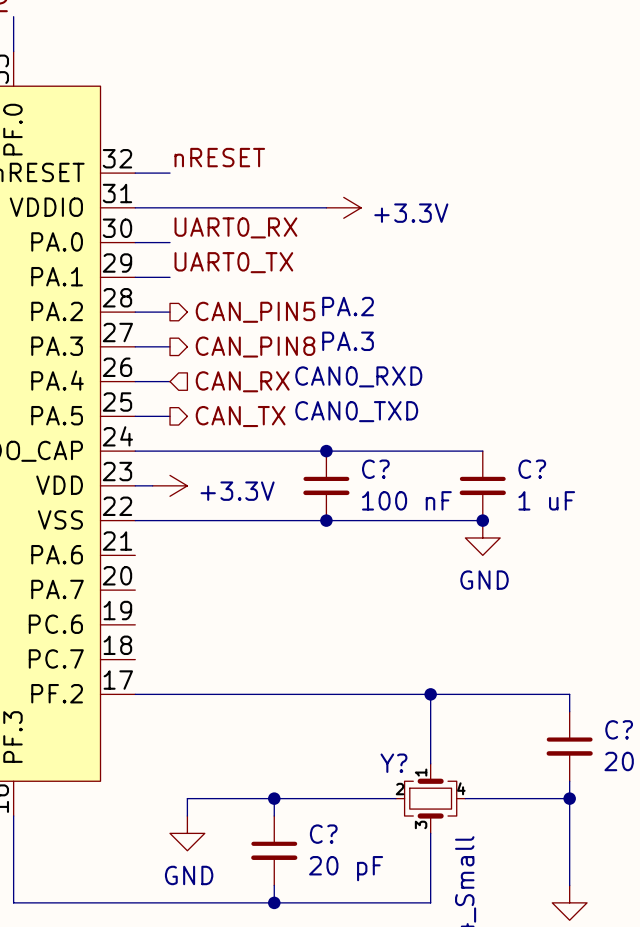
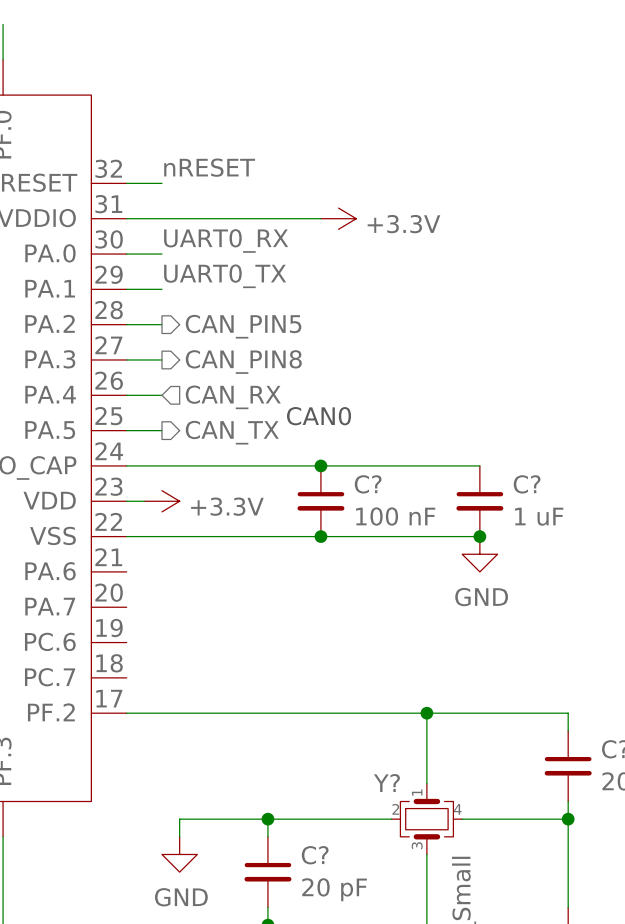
text: PA.2 (348, 306) -> none
text: PA.3 (348, 341) -> none
text: CAN0_RXD (358, 376) -> none
text: CAN0_TXD (356, 411) -> CAN0 (319, 416)

